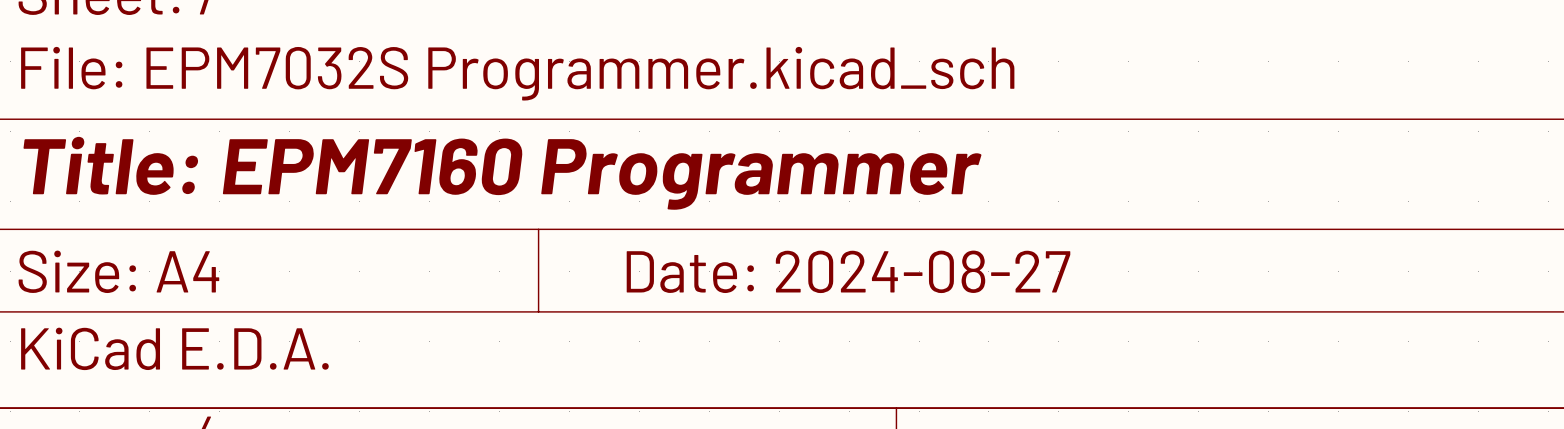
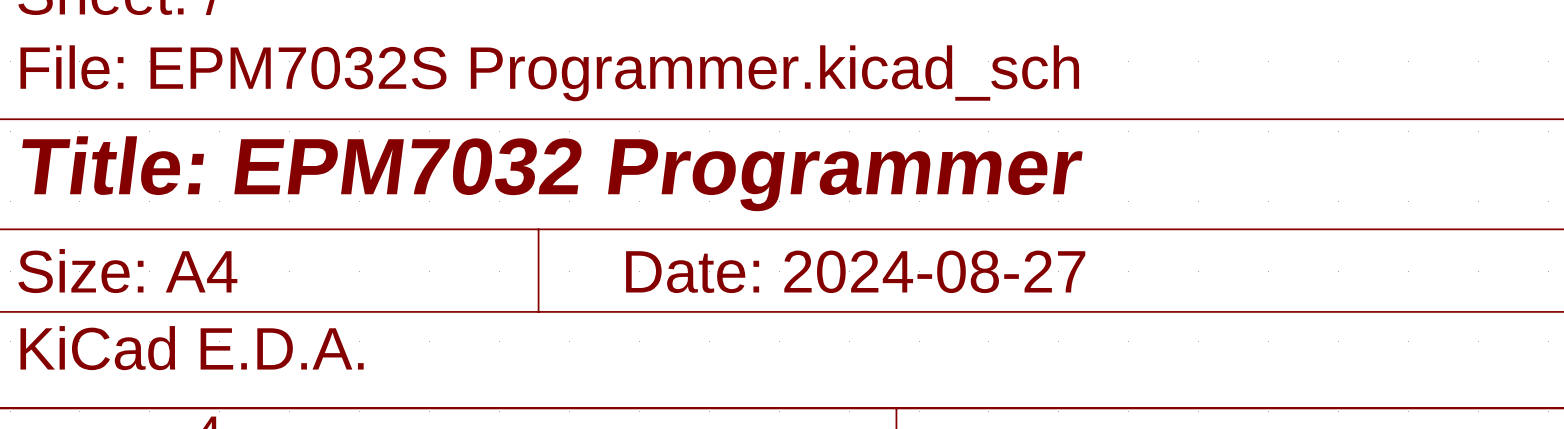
title block: Title: EPM7160 Programmer (502, 173) -> Title: EPM7032 Programmer (552, 173)

